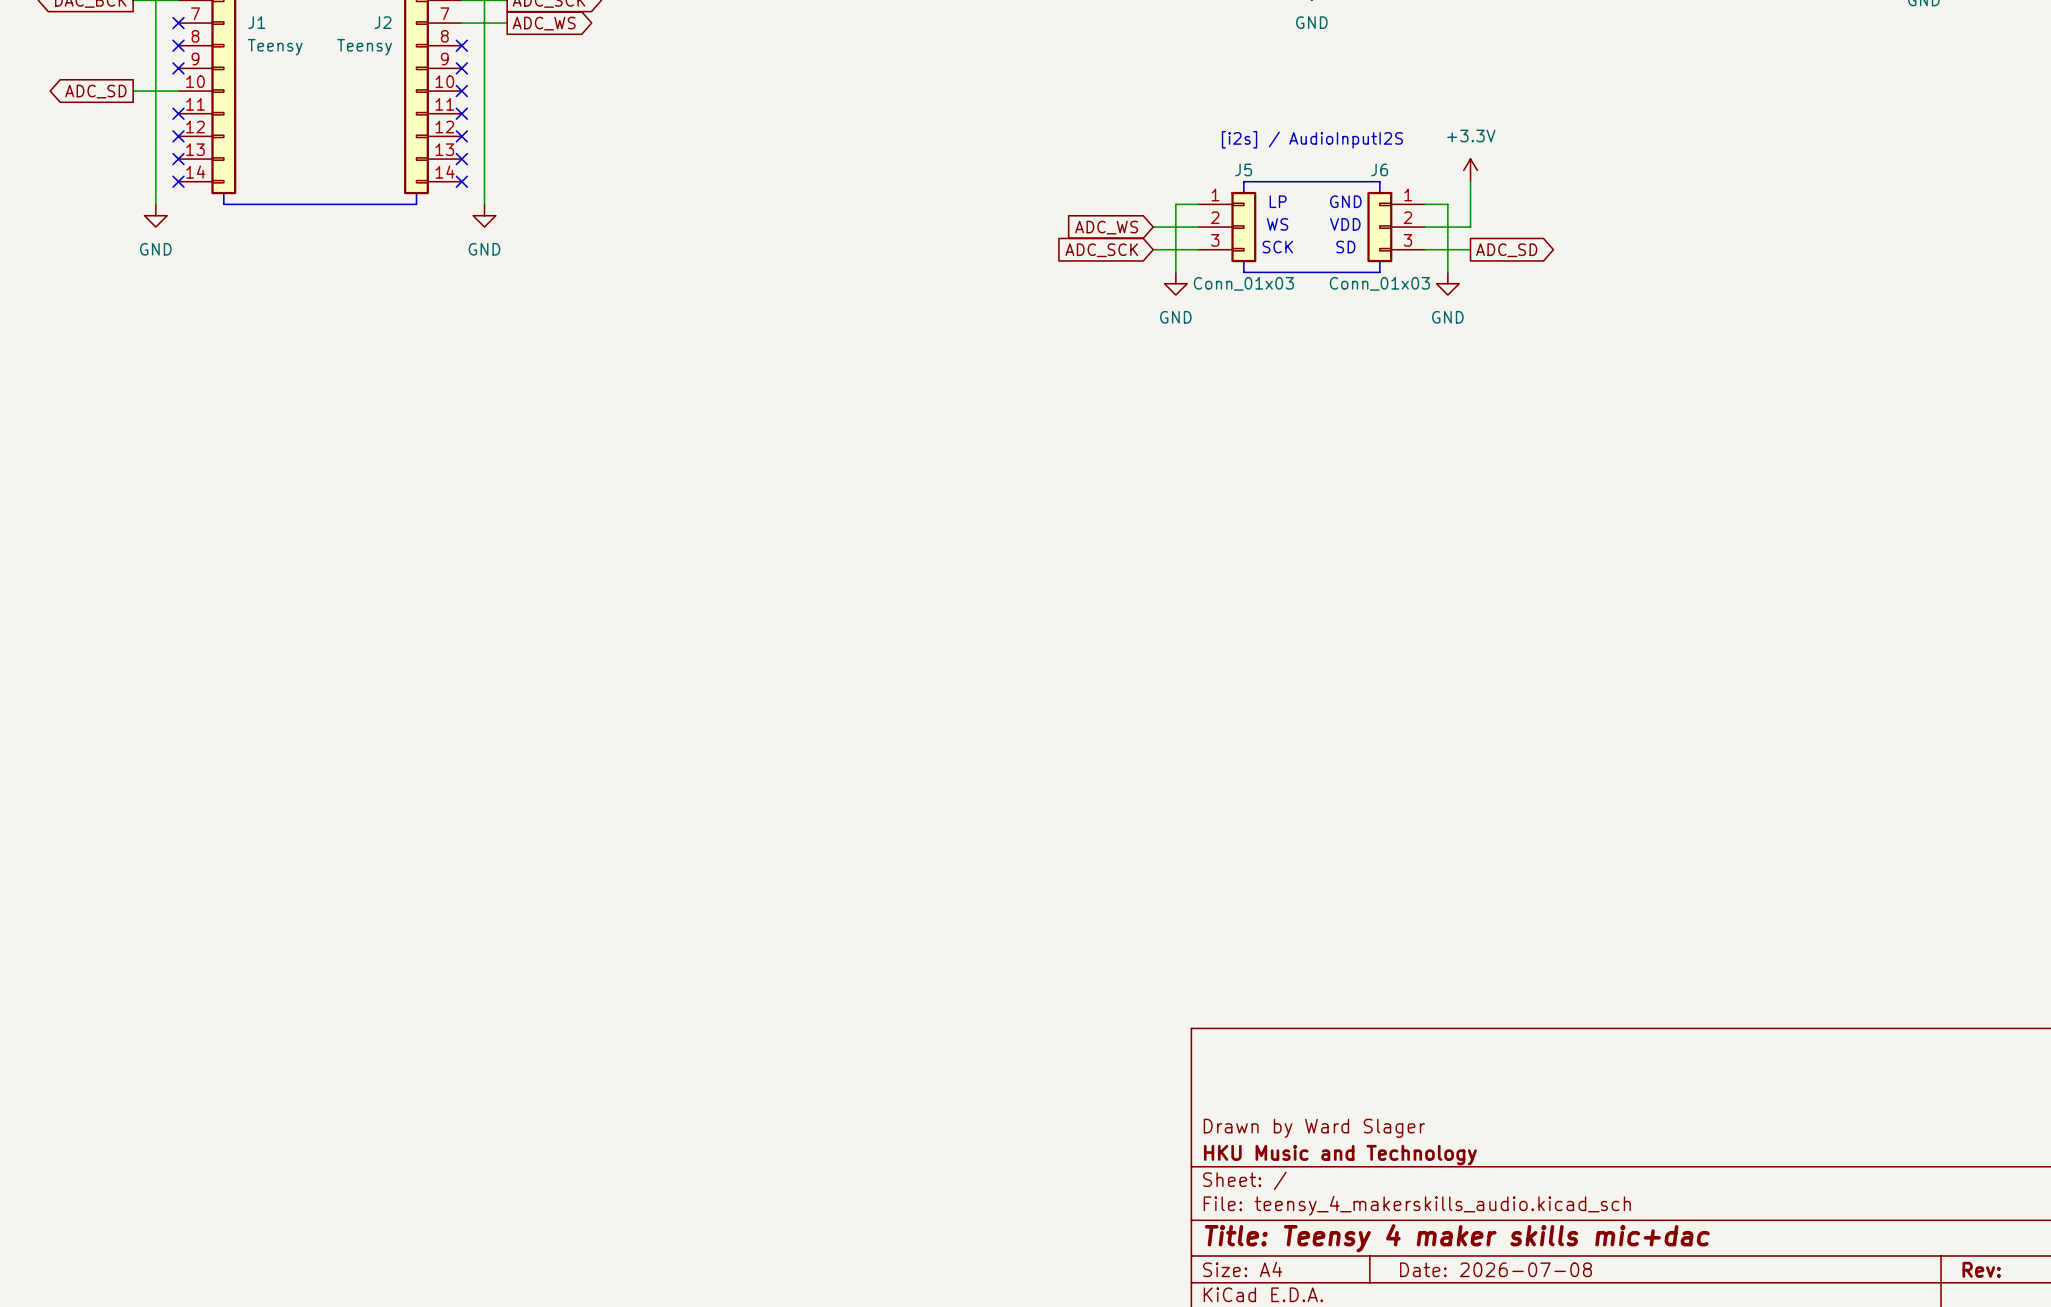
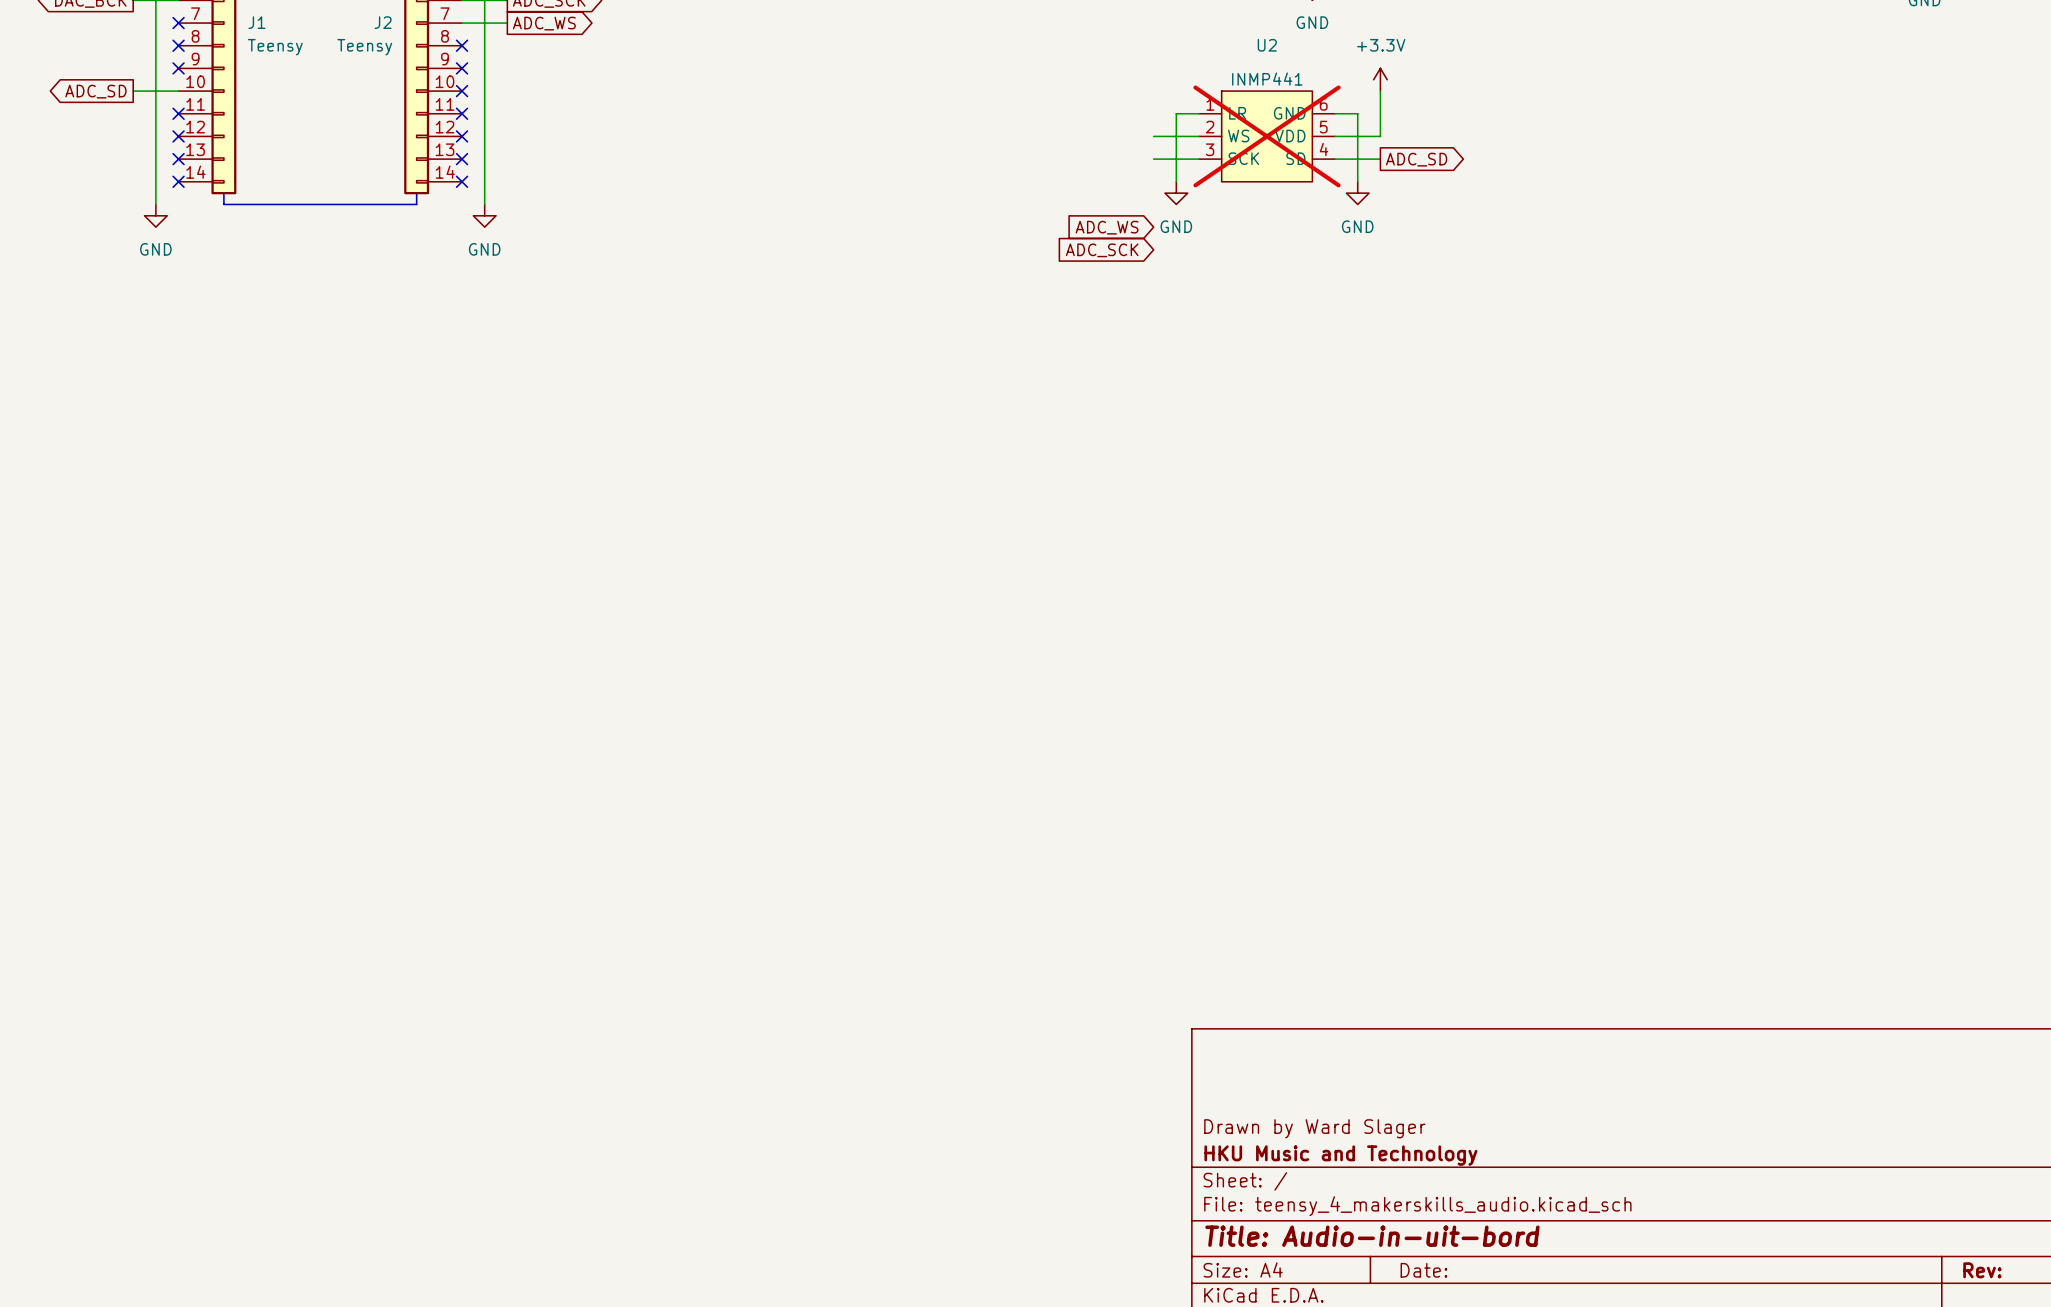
U2: none -> INMP441 (1267, 136)
text: [i2s] / AudioInputI2S (1312, 139) -> none
power symbol position: +3.3V (1470, 170) -> +3.3V (1380, 79)
wire: (1470, 181) (1470, 227) (1425, 227) -> (1380, 91) (1380, 136) (1335, 136)
line: (1243, 193) (1243, 181) (1379, 181) (1379, 193) -> none
power symbol: none -> GND (1357, 193)
text: LP (1278, 201) -> none
text: GND (1345, 201) -> none
wire: (1198, 204) (1175, 204) (1175, 272) -> (1199, 113) (1176, 113) (1176, 181)
wire: (1425, 204) (1447, 204) (1447, 272) -> (1335, 113) (1357, 113) (1357, 181)
text: WS (1277, 224) -> none
text: VDD (1345, 224) -> none
wire: (1153, 227) (1198, 227) -> (1153, 136) (1199, 136)
J5: Conn_01x03 (1227, 227) -> none
J6: Conn_01x03 (1396, 227) -> none
text: SCK (1277, 247) -> none
text: SD (1345, 247) -> none
wire: (1153, 249) (1198, 249) -> (1153, 159) (1199, 159)
wire: (1425, 249) (1470, 249) -> (1335, 159) (1380, 159)
global label position: ADC_SD (1506, 250) -> ADC_SD (1416, 159)
line: (1243, 261) (1243, 272) (1379, 272) (1379, 261) -> none
power symbol position: GND (1175, 283) -> GND (1176, 193)
power symbol: GND (1447, 283) -> none
title block: Title: Teensy 4 maker skills mic+dac (1457, 1238) -> Title: Audio-in-uit-bord (1372, 1236)
title block: Date: 2026-07-08 (1496, 1269) -> Date: (1423, 1270)

